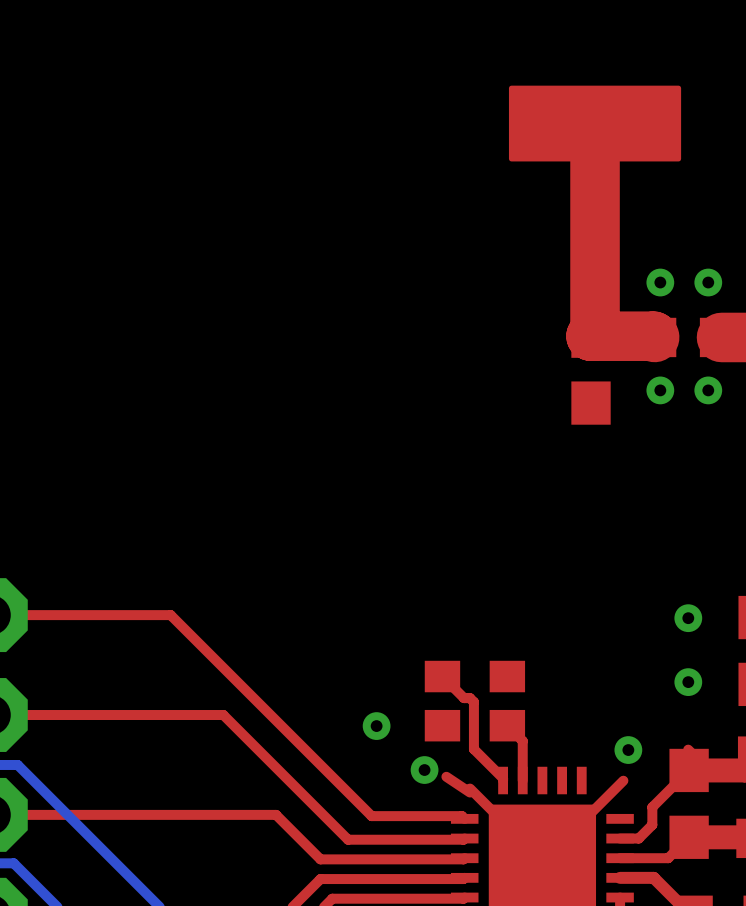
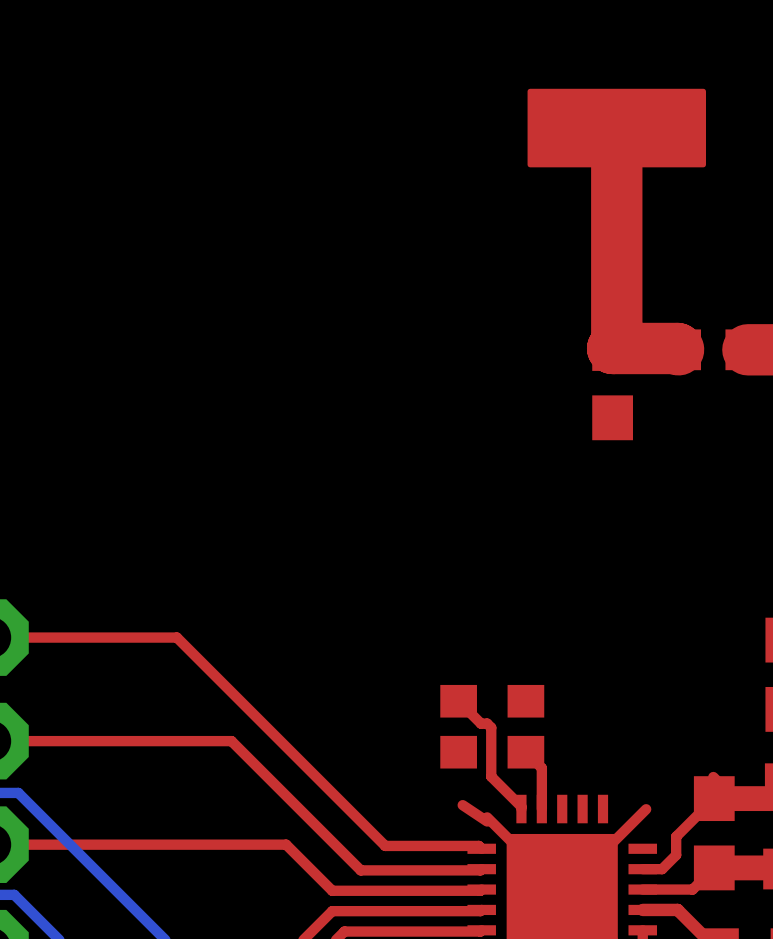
via: (660, 282) -> none
via: (708, 282) -> none
via: (660, 390) -> none
via: (708, 390) -> none
via: (688, 618) -> none
via: (688, 682) -> none
via: (376, 726) -> none
via: (628, 750) -> none
via: (424, 770) -> none

